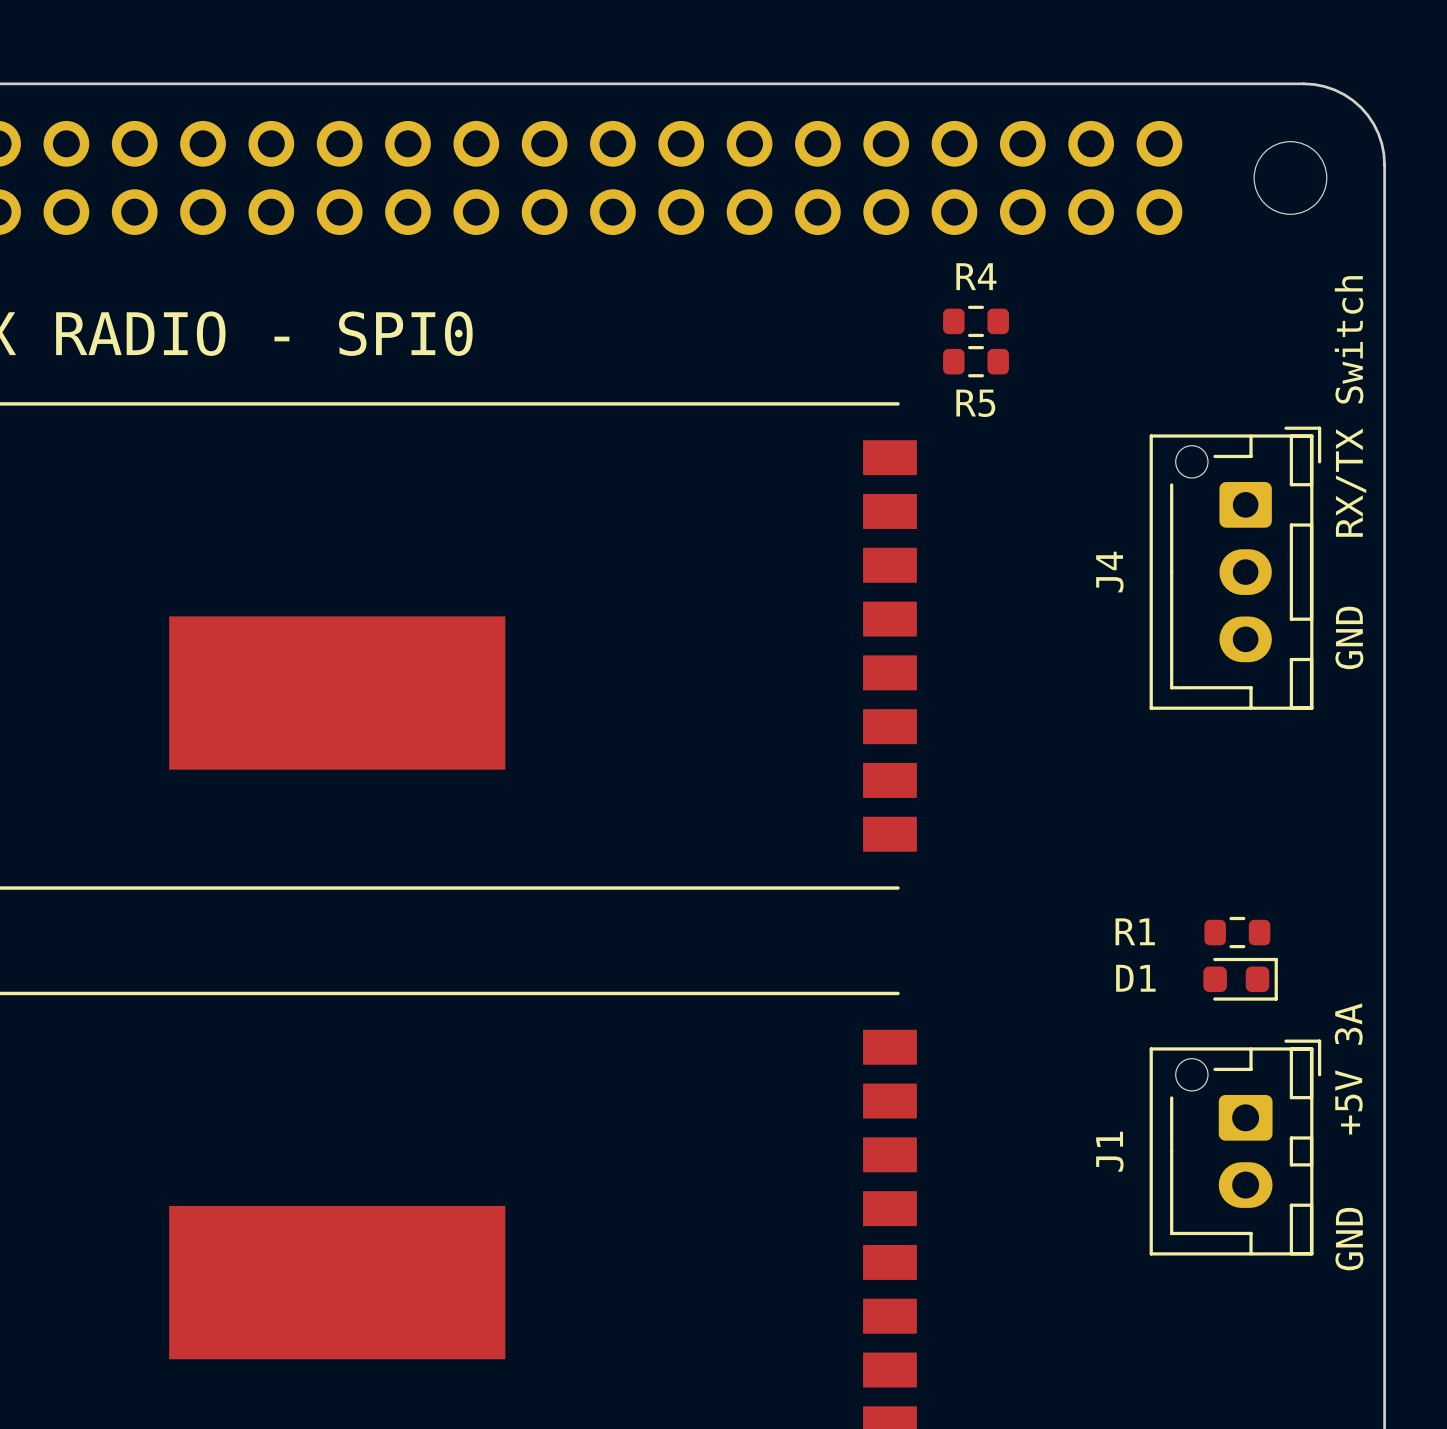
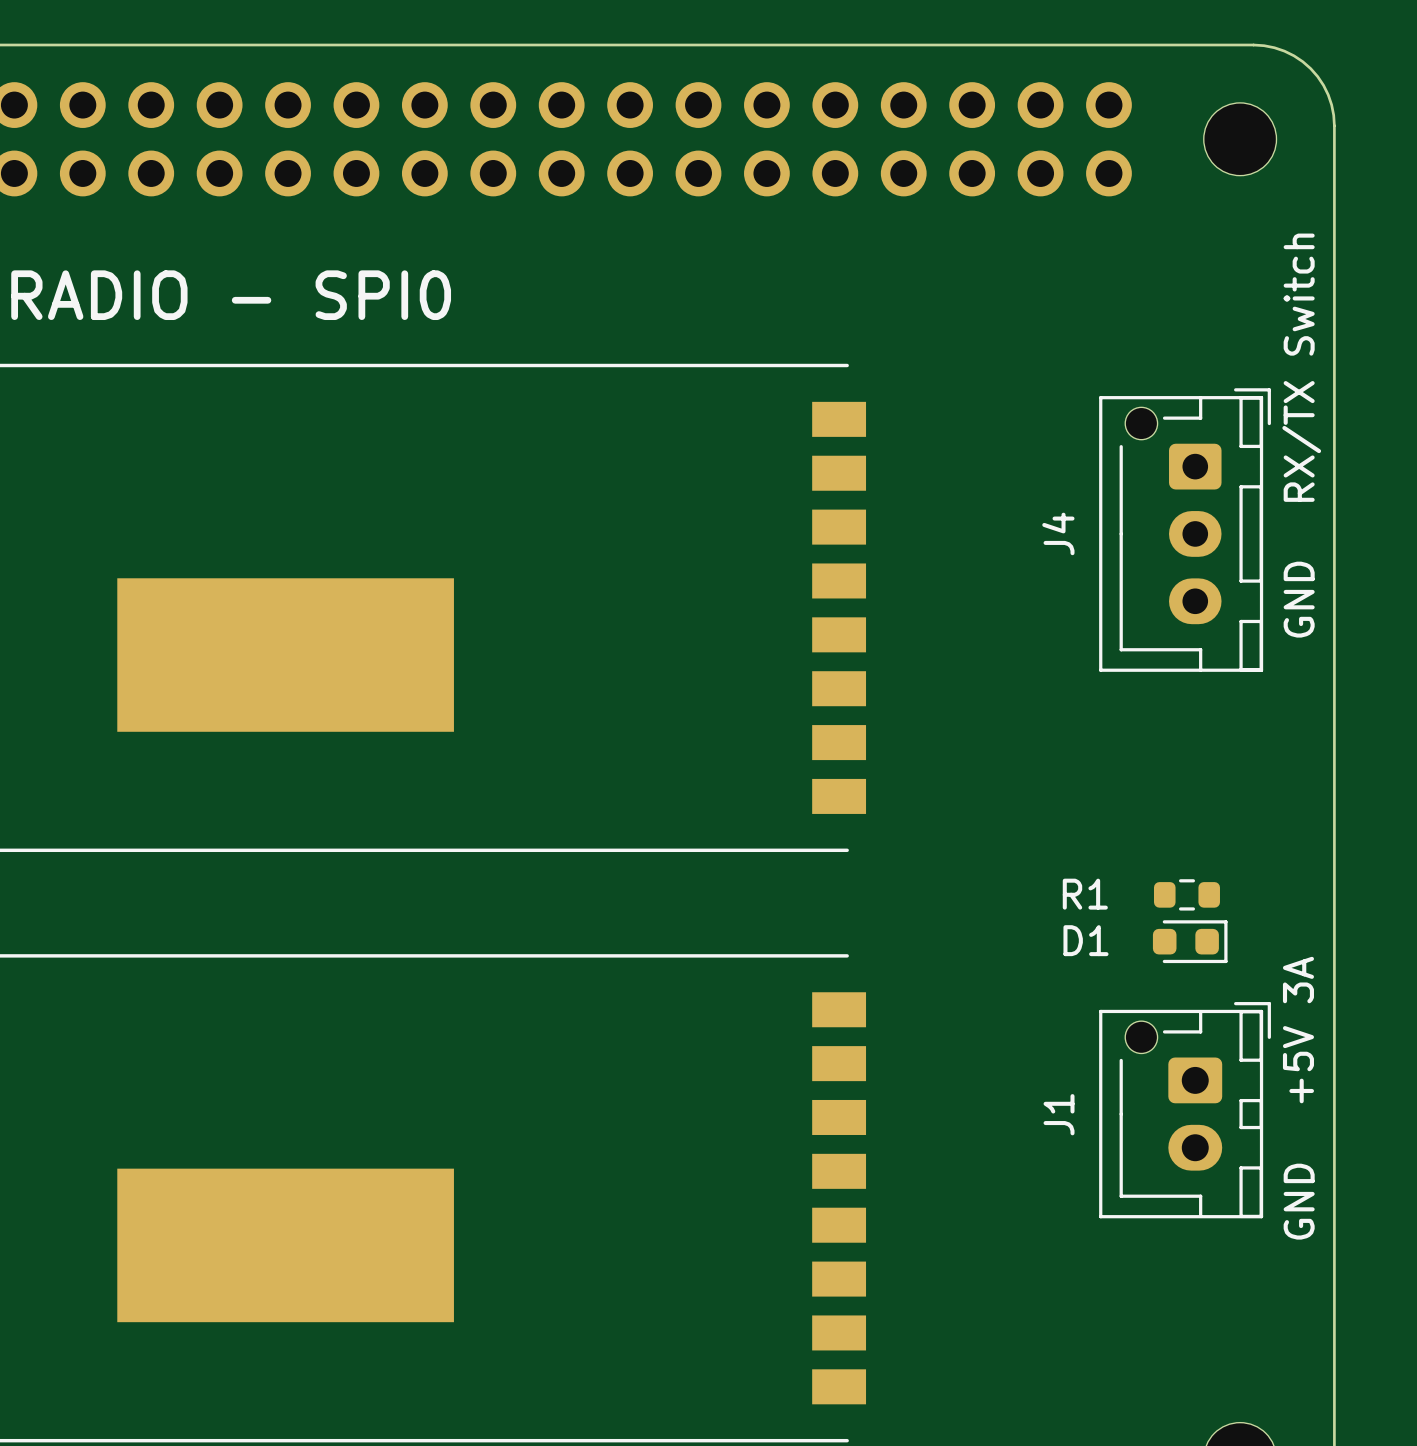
R4: (976, 321) -> none
R5: (976, 361) -> none

